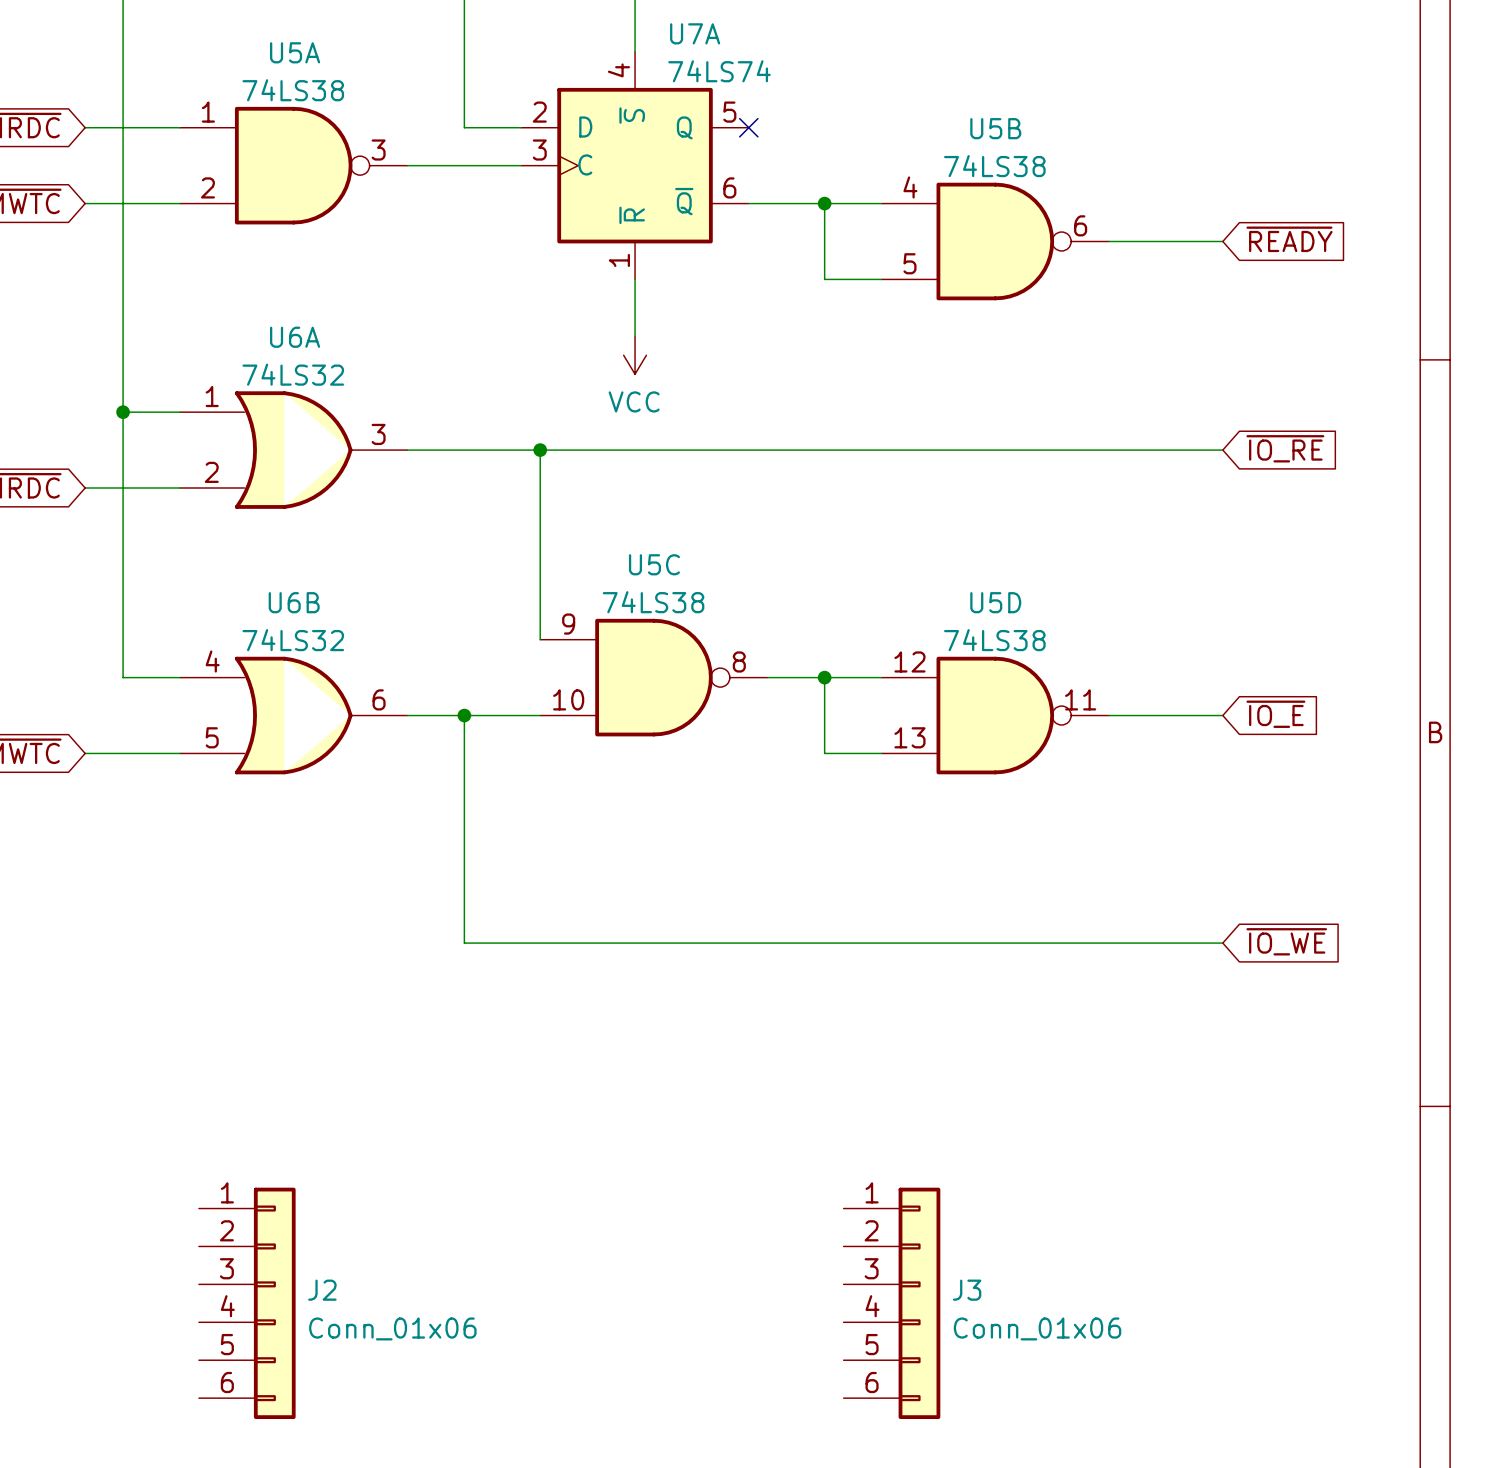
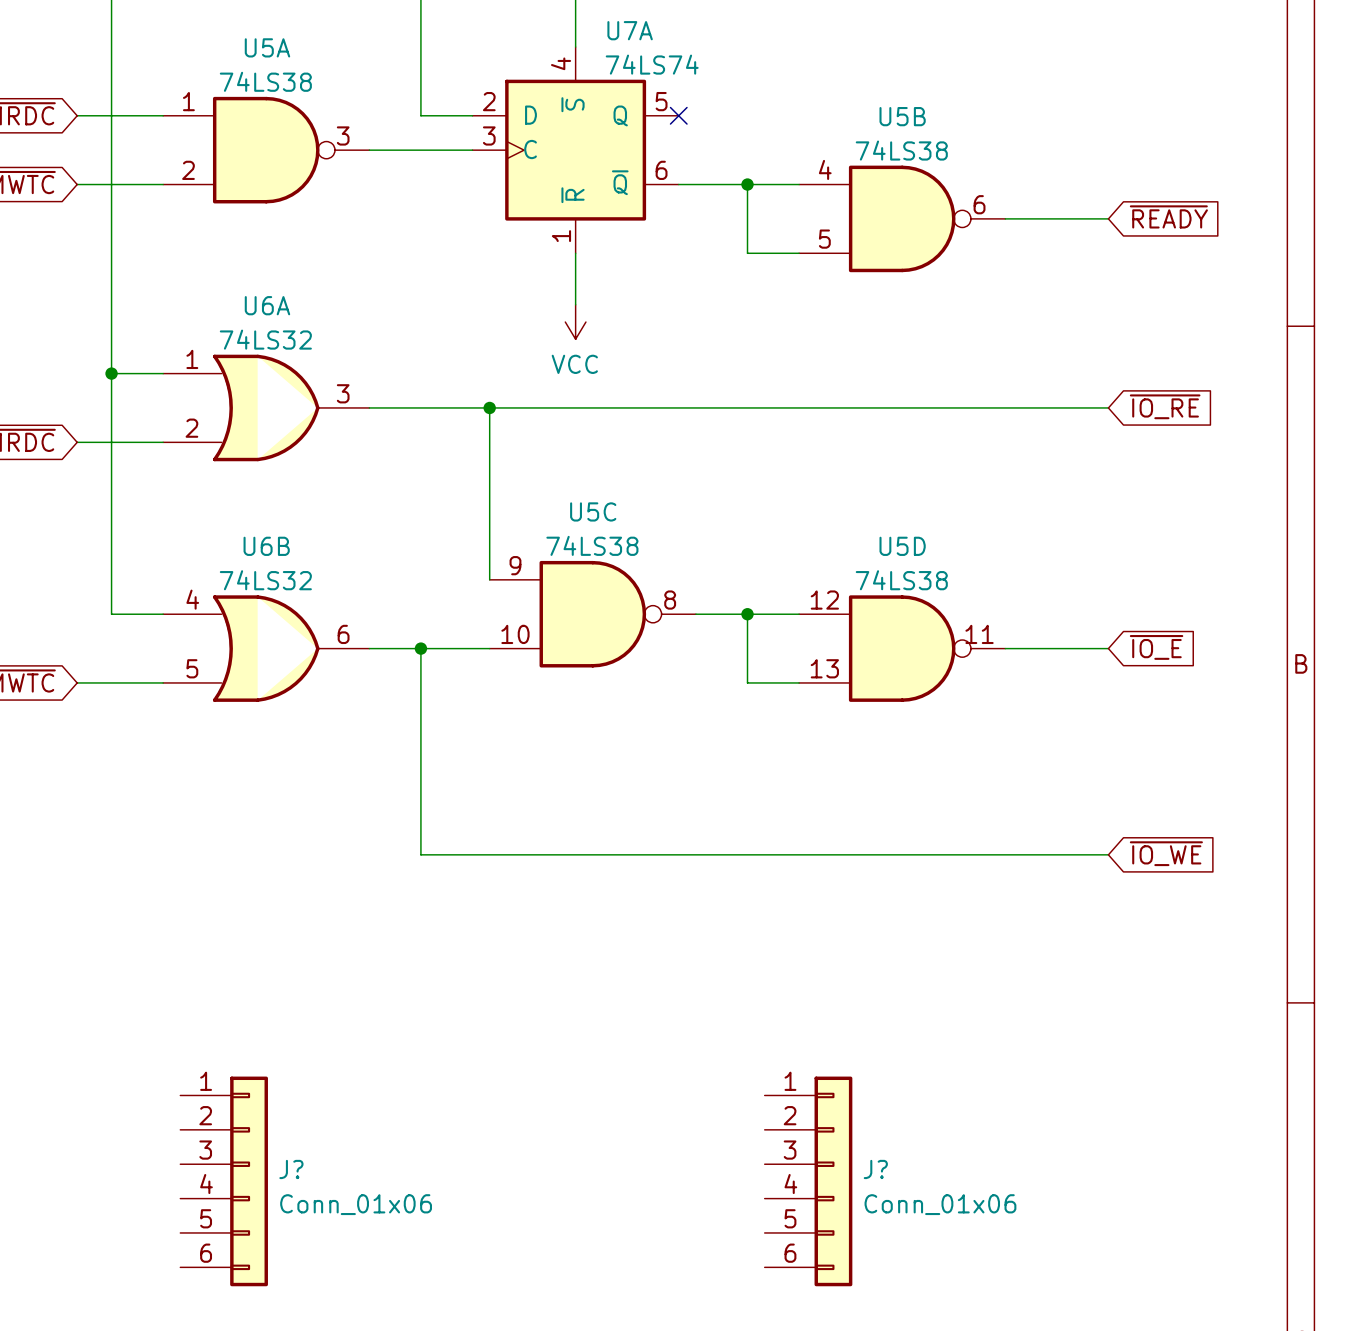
J2 name: J2 (322, 1290) -> J? (291, 1169)
J3 name: J3 (967, 1290) -> J? (875, 1169)

